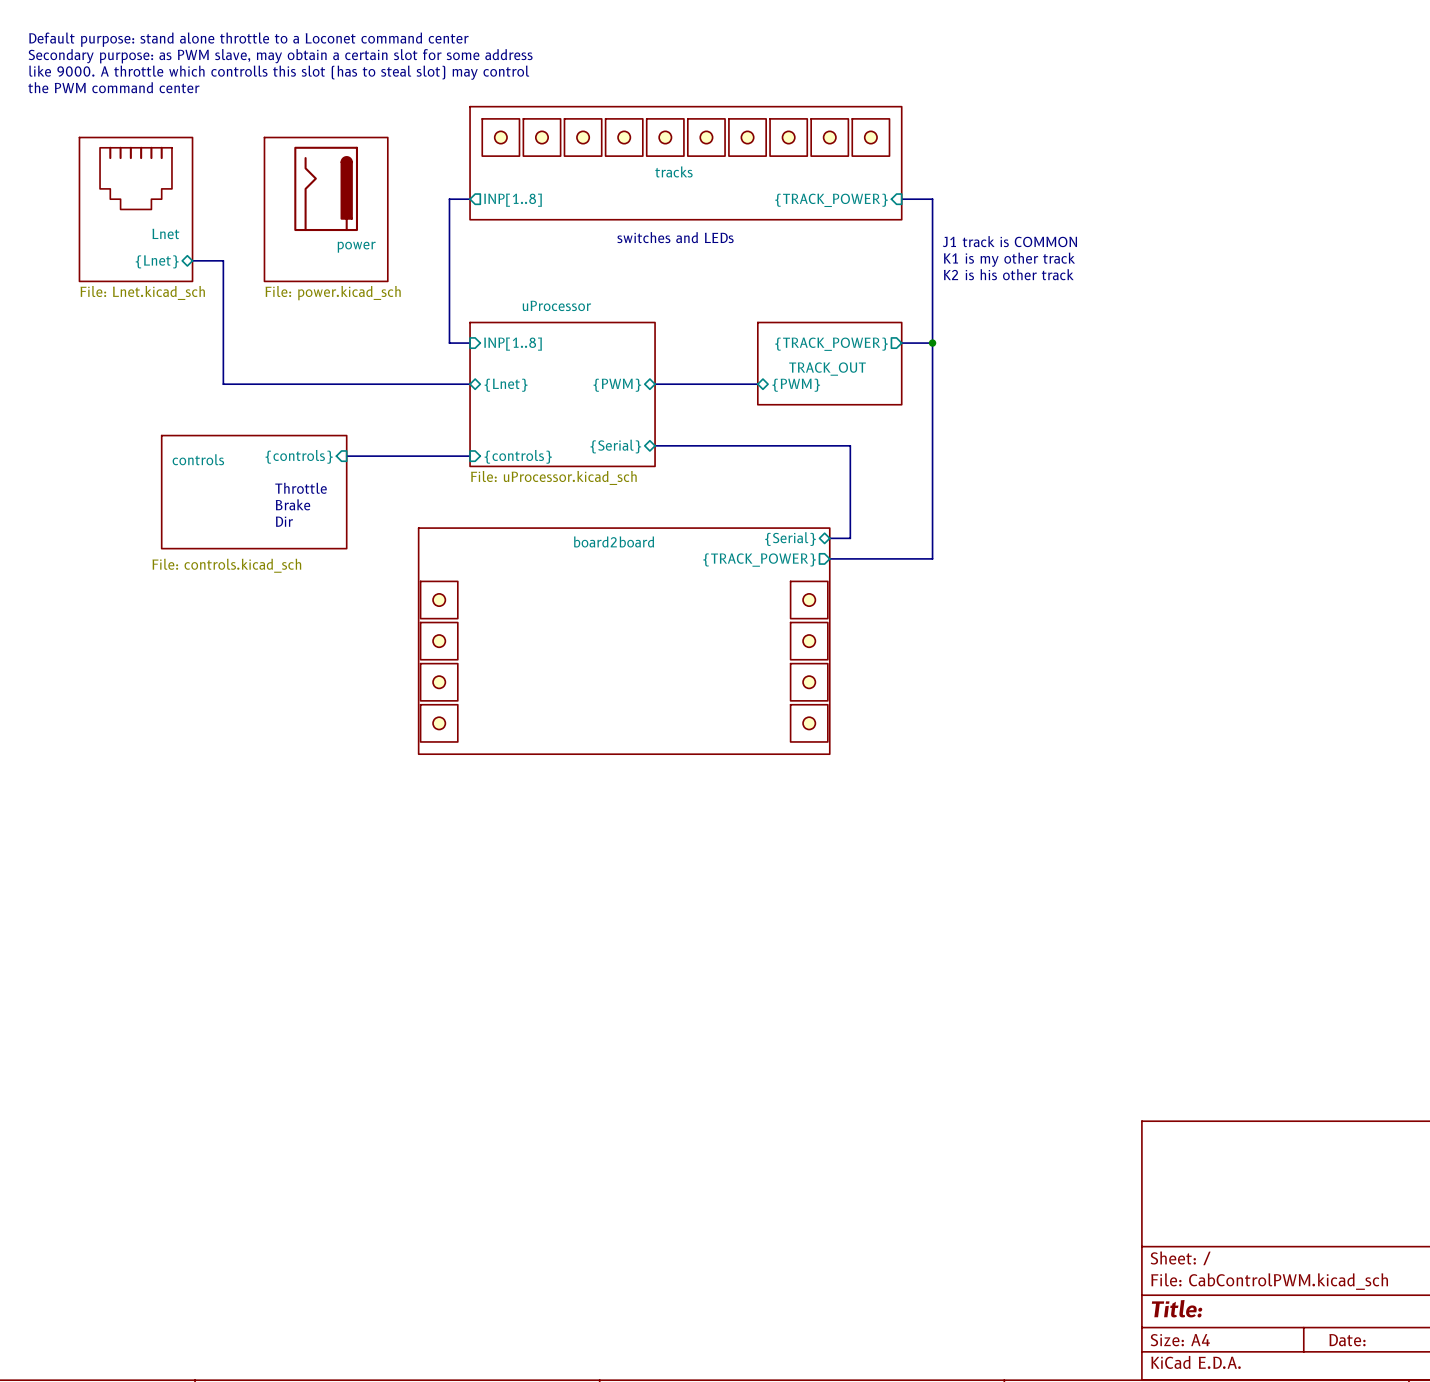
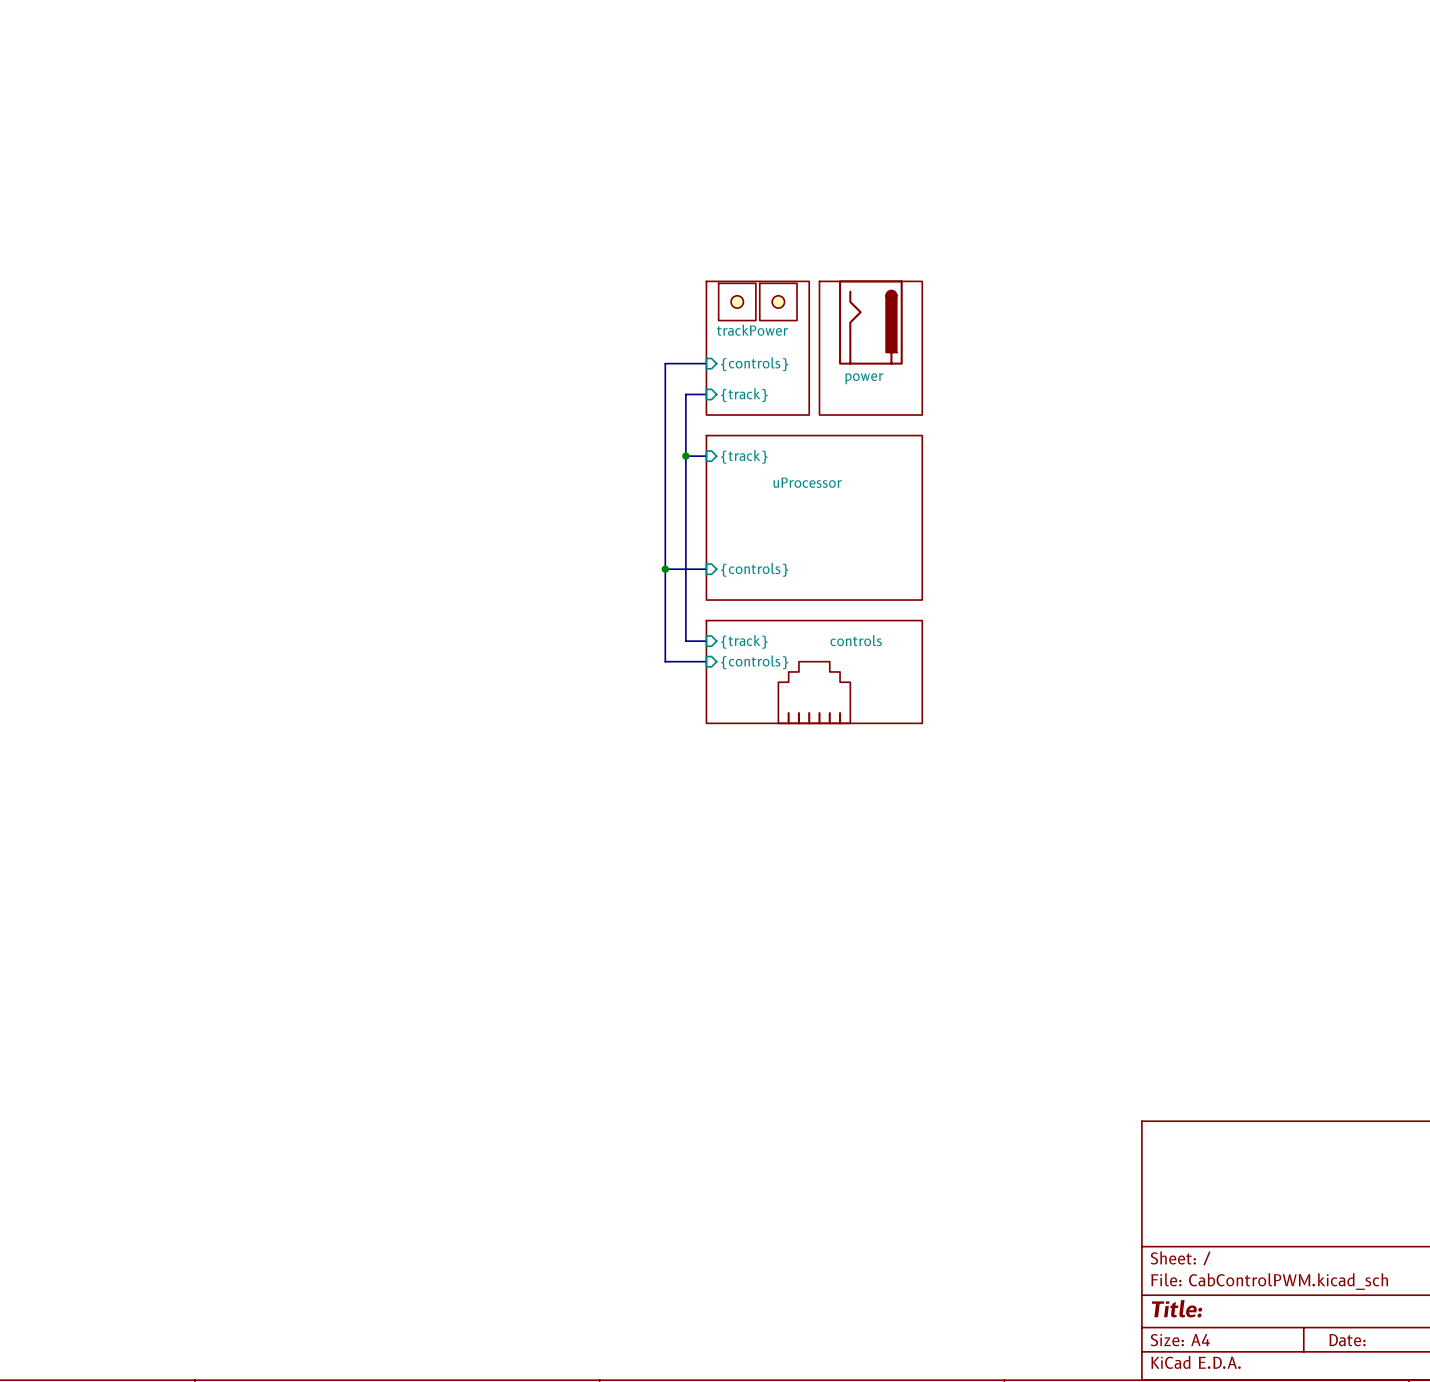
text: Default purpose: stand alone throttle to a Loconet command center (248, 39) -> none
text: Secondary purpose: as PWM slave, may obtain a certain slot for some address (280, 56) -> none
text: like 9000. A throttle which controlls this slot (has to steal slot) may control (279, 72) -> none
text: the PWM command center (113, 87) -> none
part: (500, 137) -> none
part: (541, 137) -> none
part: (583, 137) -> none
part: (624, 137) -> none
part: (665, 137) -> none
part: (706, 137) -> none
part: (747, 137) -> none
part: (788, 137) -> none
part: (829, 137) -> none
part: (870, 137) -> none
sheet tracks: (685, 163) -> none
part: (136, 178) -> none
part: (326, 188) -> none
bus: (470, 199) (449, 199) (449, 343) (470, 343) -> none
bus: (901, 199) (932, 199) (932, 558) (829, 558) -> none
sheet pin: INP[1..8] (513, 200) -> none
sheet pin: {TRACK_POWER} (831, 200) -> none
sheet Lnet: File: Lnet.kicad_sch (136, 209) -> none
sheet power: File: power.kicad_sch (326, 209) -> none
text: switches and LEDs (675, 237) -> none
text: J1 track is COMMON (1009, 241) -> none
text: K1 is my other track (1009, 259) -> none
bus: (192, 260) (223, 260) (223, 384) (470, 384) -> none
sheet pin: {Lnet} (157, 261) -> none
text: K2 is his other track (1008, 274) -> none
part: none -> (737, 301)
part: none -> (778, 301)
part: none -> (870, 322)
bus: (901, 343) (932, 343) -> none
junction: (932, 343) -> none
sheet pin: INP[1..8] (513, 344) -> none
sheet pin: {TRACK_POWER} (831, 344) -> none
sheet trackPower: none -> (757, 348)
sheet power: none -> (870, 348)
bus: none -> (706, 363) (665, 363) (665, 661) (706, 661)
sheet TRACK_OUT: (829, 363) -> none
sheet pin: none -> {controls} (754, 364)
bus: (655, 384) (757, 384) -> none
sheet pin: {Lnet} (506, 385) -> none
sheet pin: {PWM} (617, 385) -> none
sheet pin: {PWM} (796, 385) -> none
sheet uProcessor: File: uProcessor.kicad_sch (562, 394) -> none
bus: none -> (706, 394) (685, 394) (685, 641) (706, 641)
sheet pin: none -> {track} (744, 395)
bus: (655, 445) (850, 445) (850, 538) (829, 538) -> none
sheet pin: {Serial} (615, 446) -> none
sheet pin: {controls} (299, 456) -> none
bus: (346, 456) (470, 456) -> none
sheet pin: {controls} (518, 456) -> none
bus: none -> (685, 456) (706, 456)
junction: none -> (685, 456)
sheet pin: none -> {track} (744, 456)
text: Throttle (301, 488) -> none
sheet controls: File: controls.kicad_sch (254, 492) -> none
text: Brake (293, 504) -> none
sheet uProcessor: none -> (814, 517)
text: Dir (284, 521) -> none
sheet pin: {Serial} (790, 539) -> none
sheet pin: {TRACK_POWER} (759, 560) -> none
bus: none -> (665, 569) (706, 569)
junction: none -> (665, 569)
sheet pin: none -> {controls} (754, 569)
part: (439, 600) -> none
part: (809, 600) -> none
part: (439, 641) -> none
sheet board2board: (624, 641) -> none
sheet pin: none -> {track} (744, 641)
part: (809, 641) -> none
sheet pin: none -> {controls} (754, 662)
sheet controls: none -> (814, 671)
part: (439, 682) -> none
part: (809, 682) -> none
part: none -> (814, 693)
part: (439, 723) -> none
part: (809, 723) -> none

